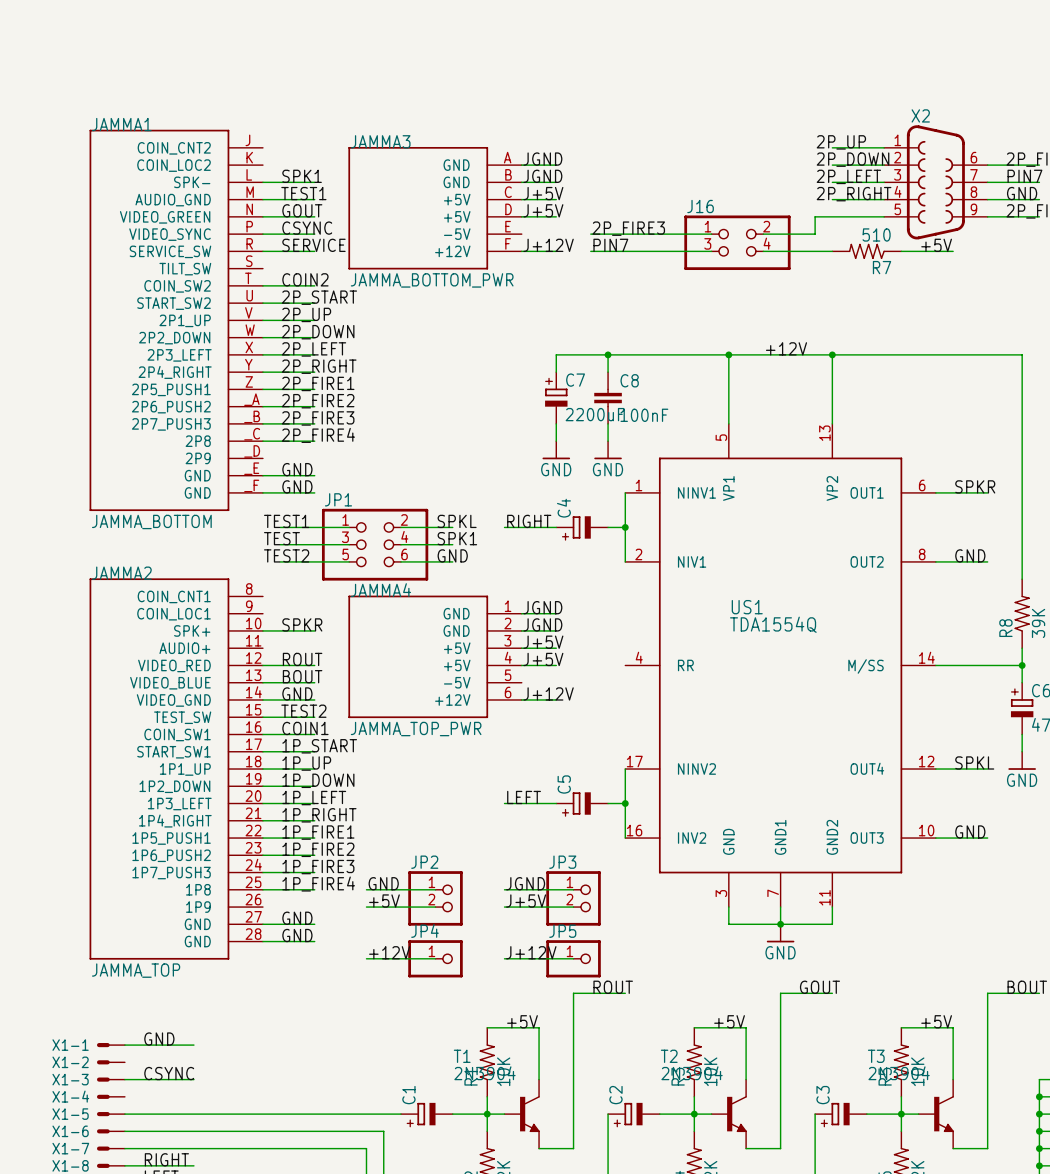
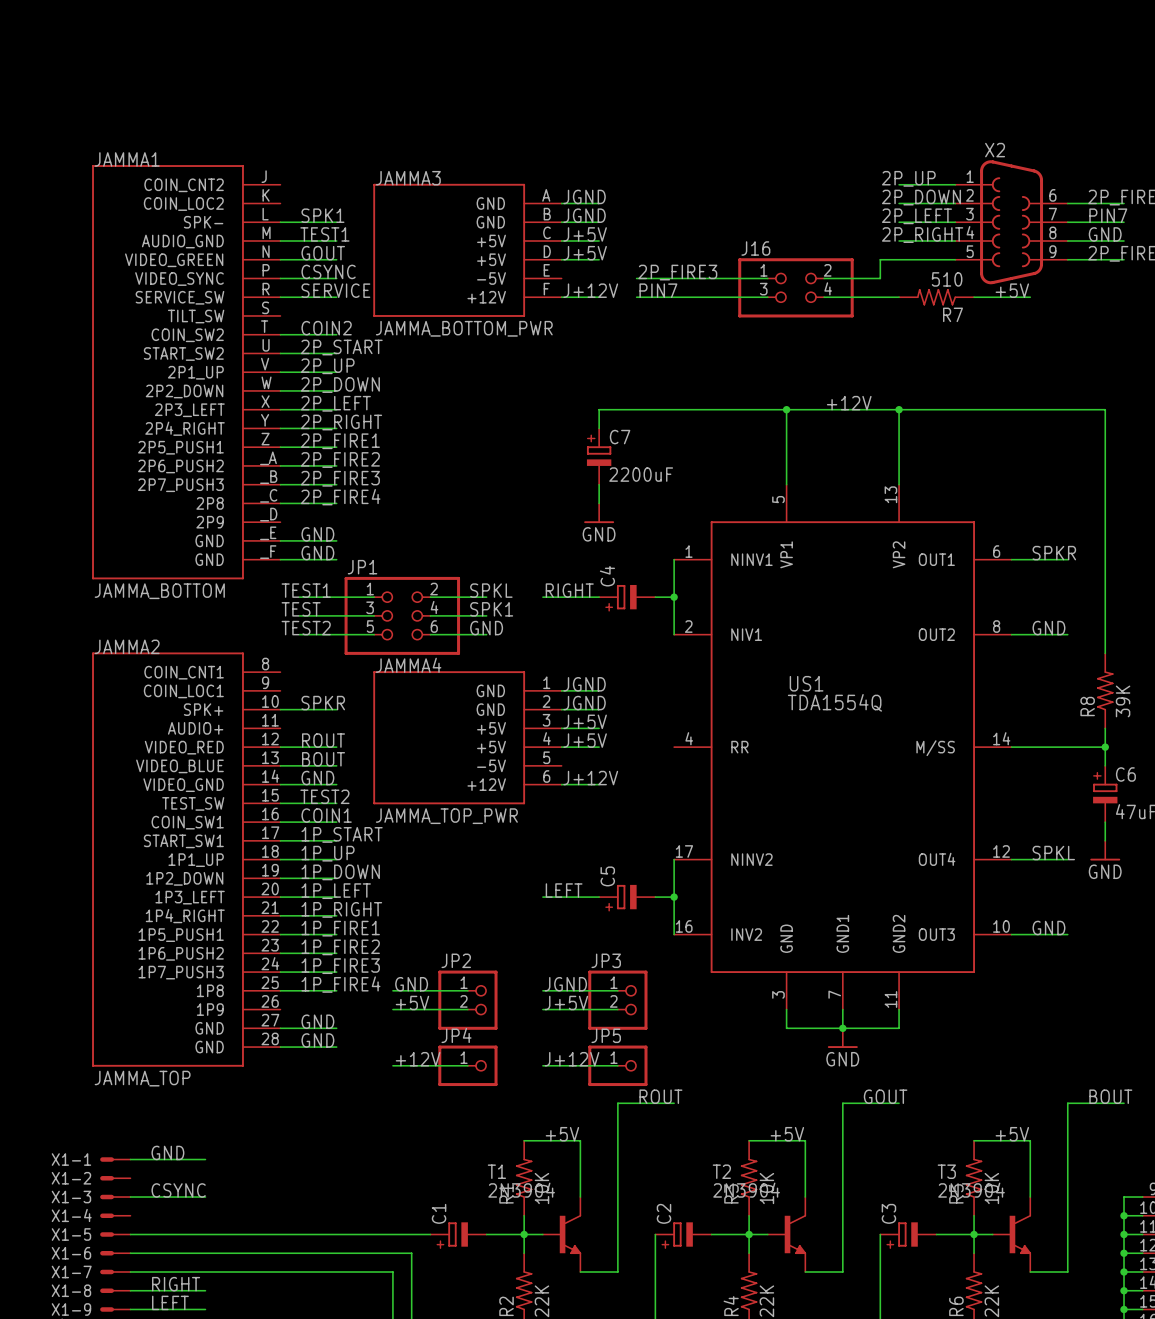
wire: (608, 354) (608, 372) -> none
junction: (608, 354) -> none
C8: 100nF (608, 398) -> none
wire: (608, 423) (608, 441) -> none
power symbol: GND (608, 450) -> none

